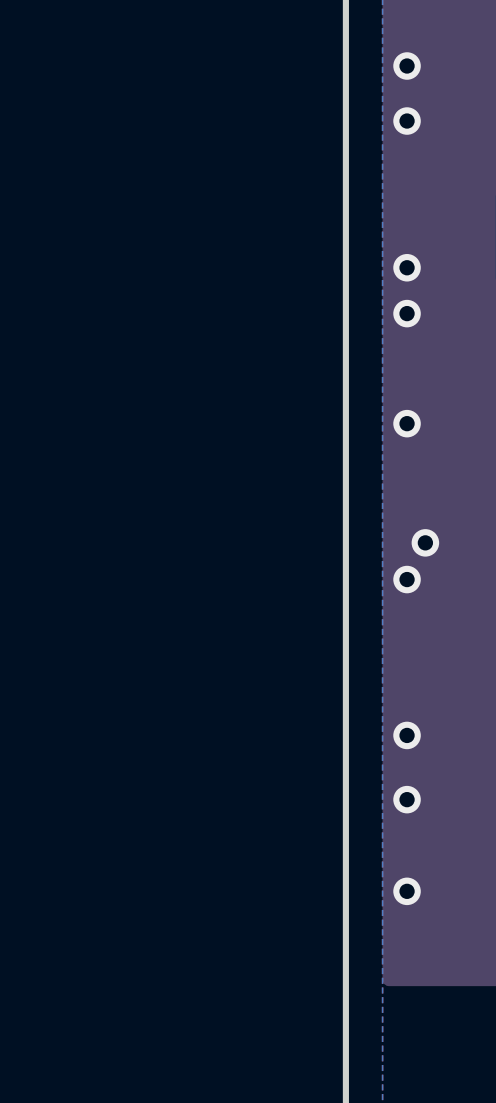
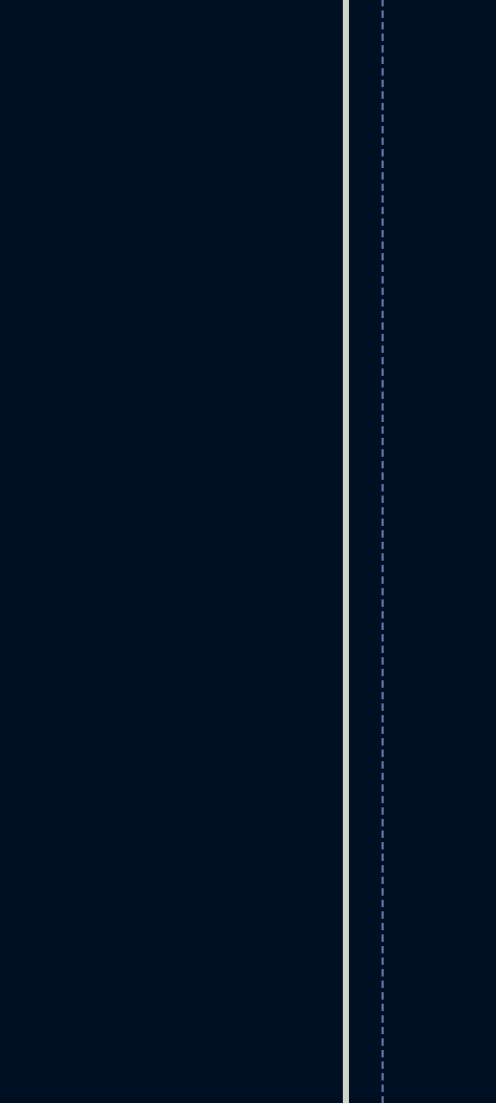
via: (407, 66) -> none
via: (407, 121) -> none
via: (407, 267) -> none
via: (407, 313) -> none
via: (407, 423) -> none
via: (425, 542) -> none
via: (407, 579) -> none
via: (407, 735) -> none
via: (407, 799) -> none
via: (407, 891) -> none

